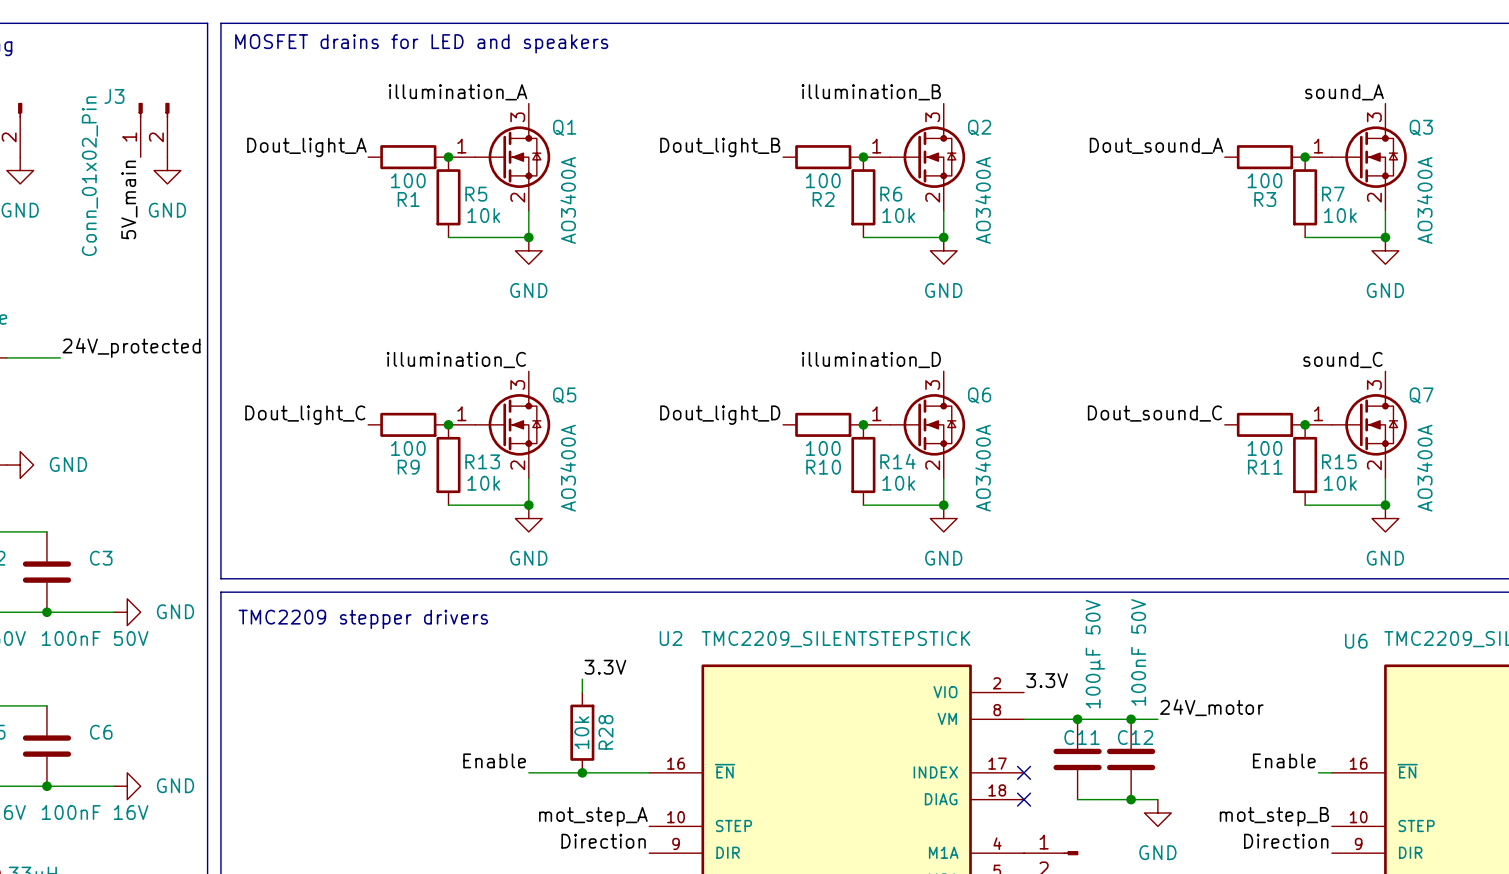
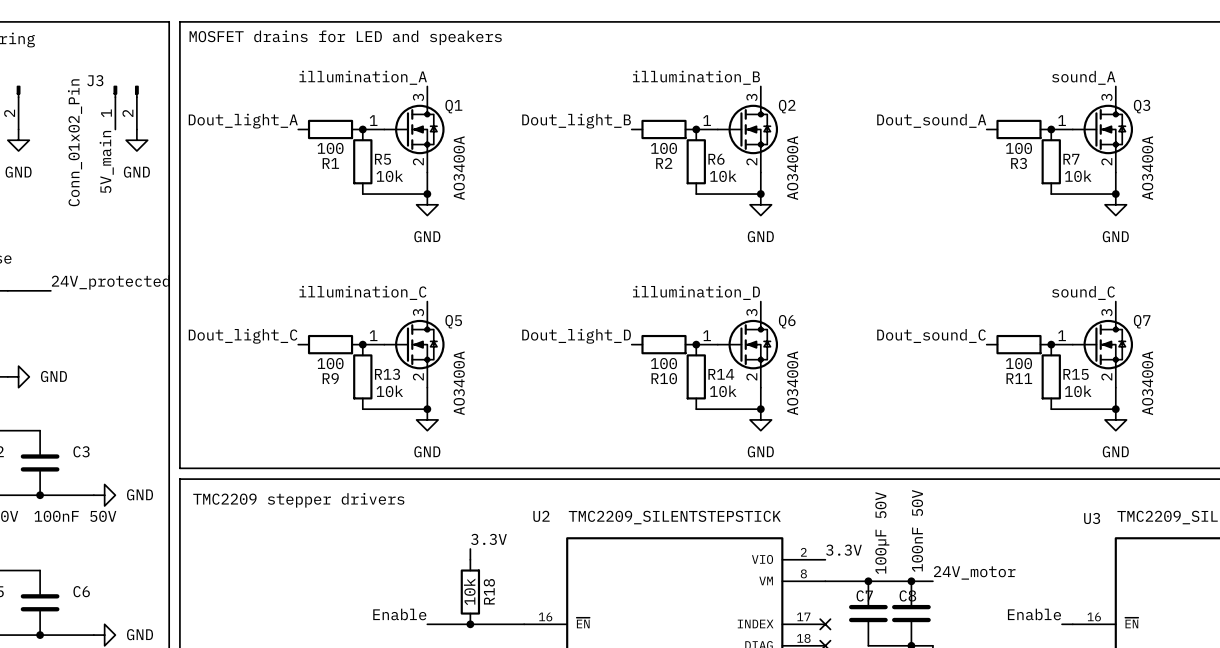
U6 name: U6 (1356, 641) -> U3 (1092, 518)
R28 name: R28 (605, 732) -> R18 (489, 591)
C11 name: C11 (1082, 737) -> C7 (864, 595)
C12 name: C12 (1135, 737) -> C8 (907, 595)

